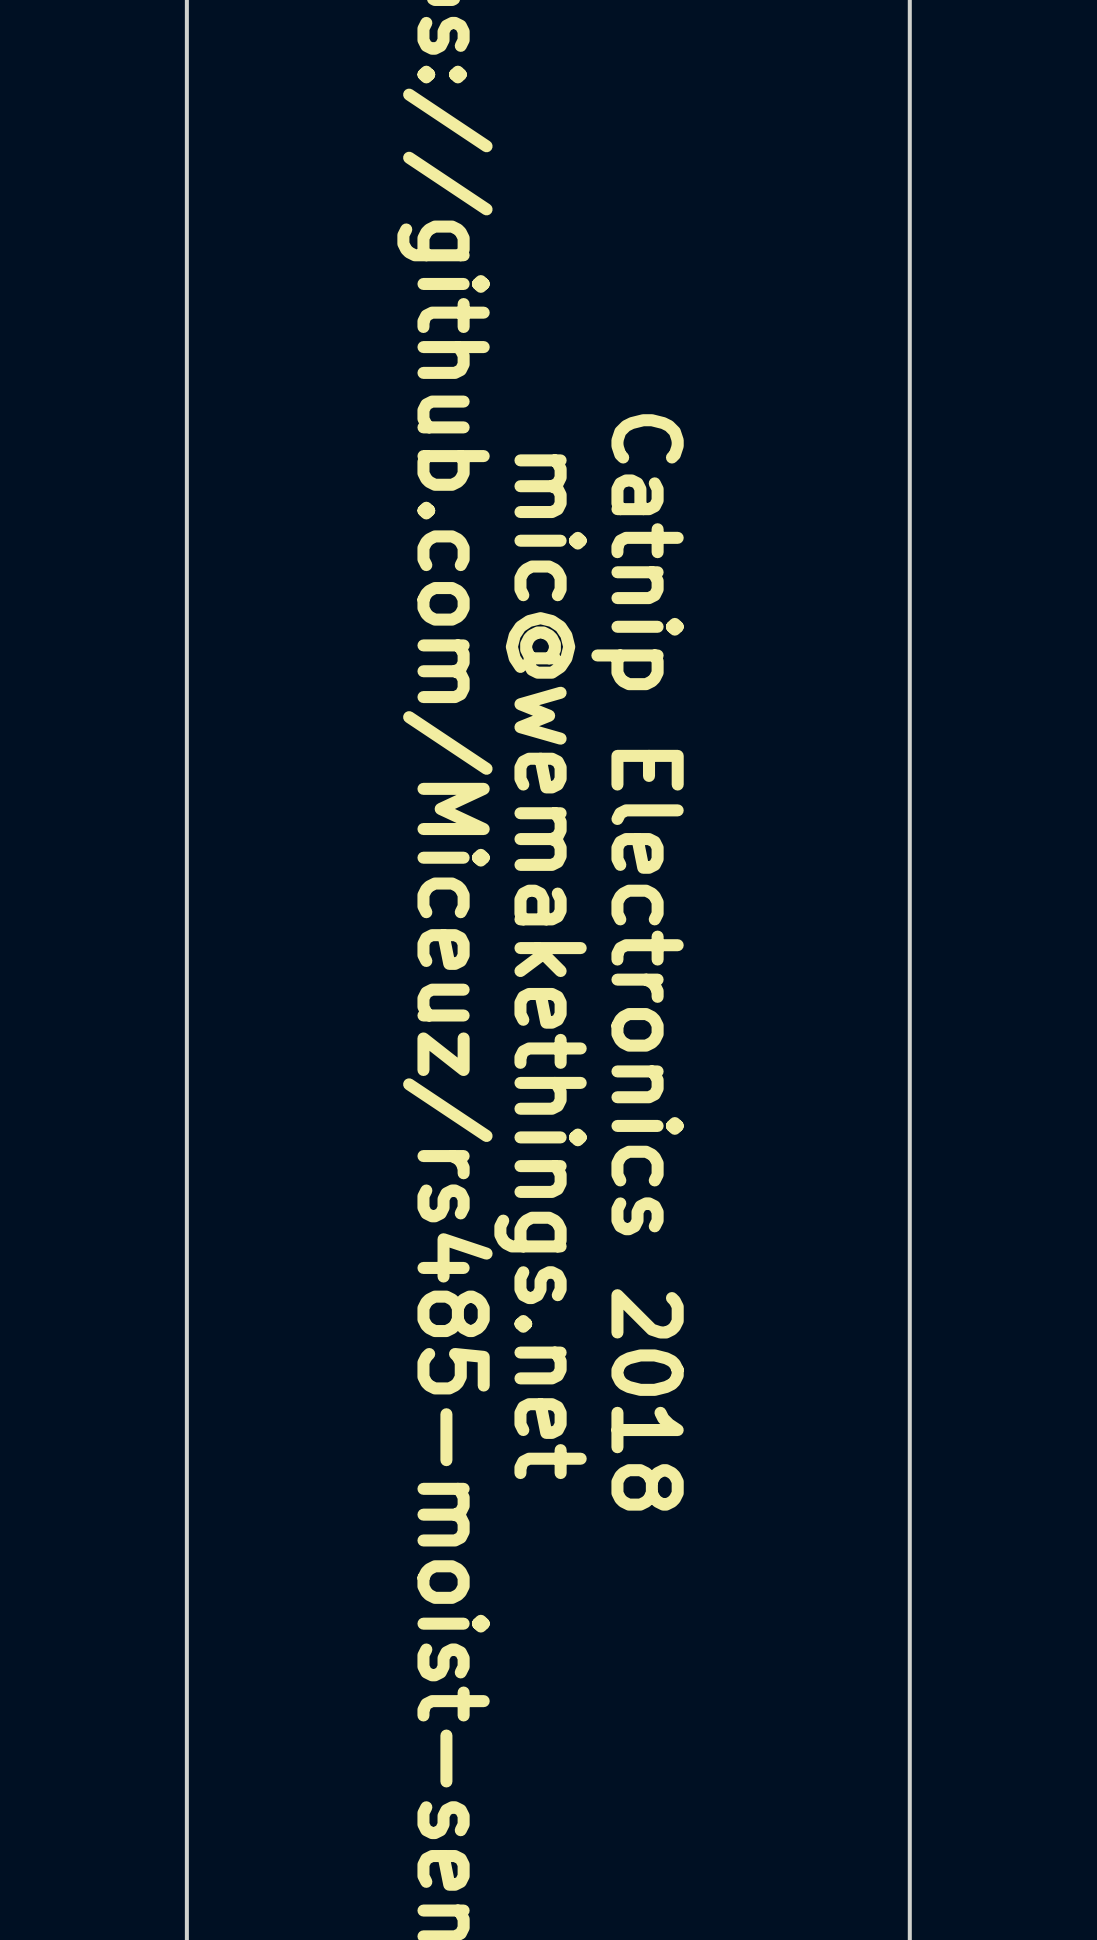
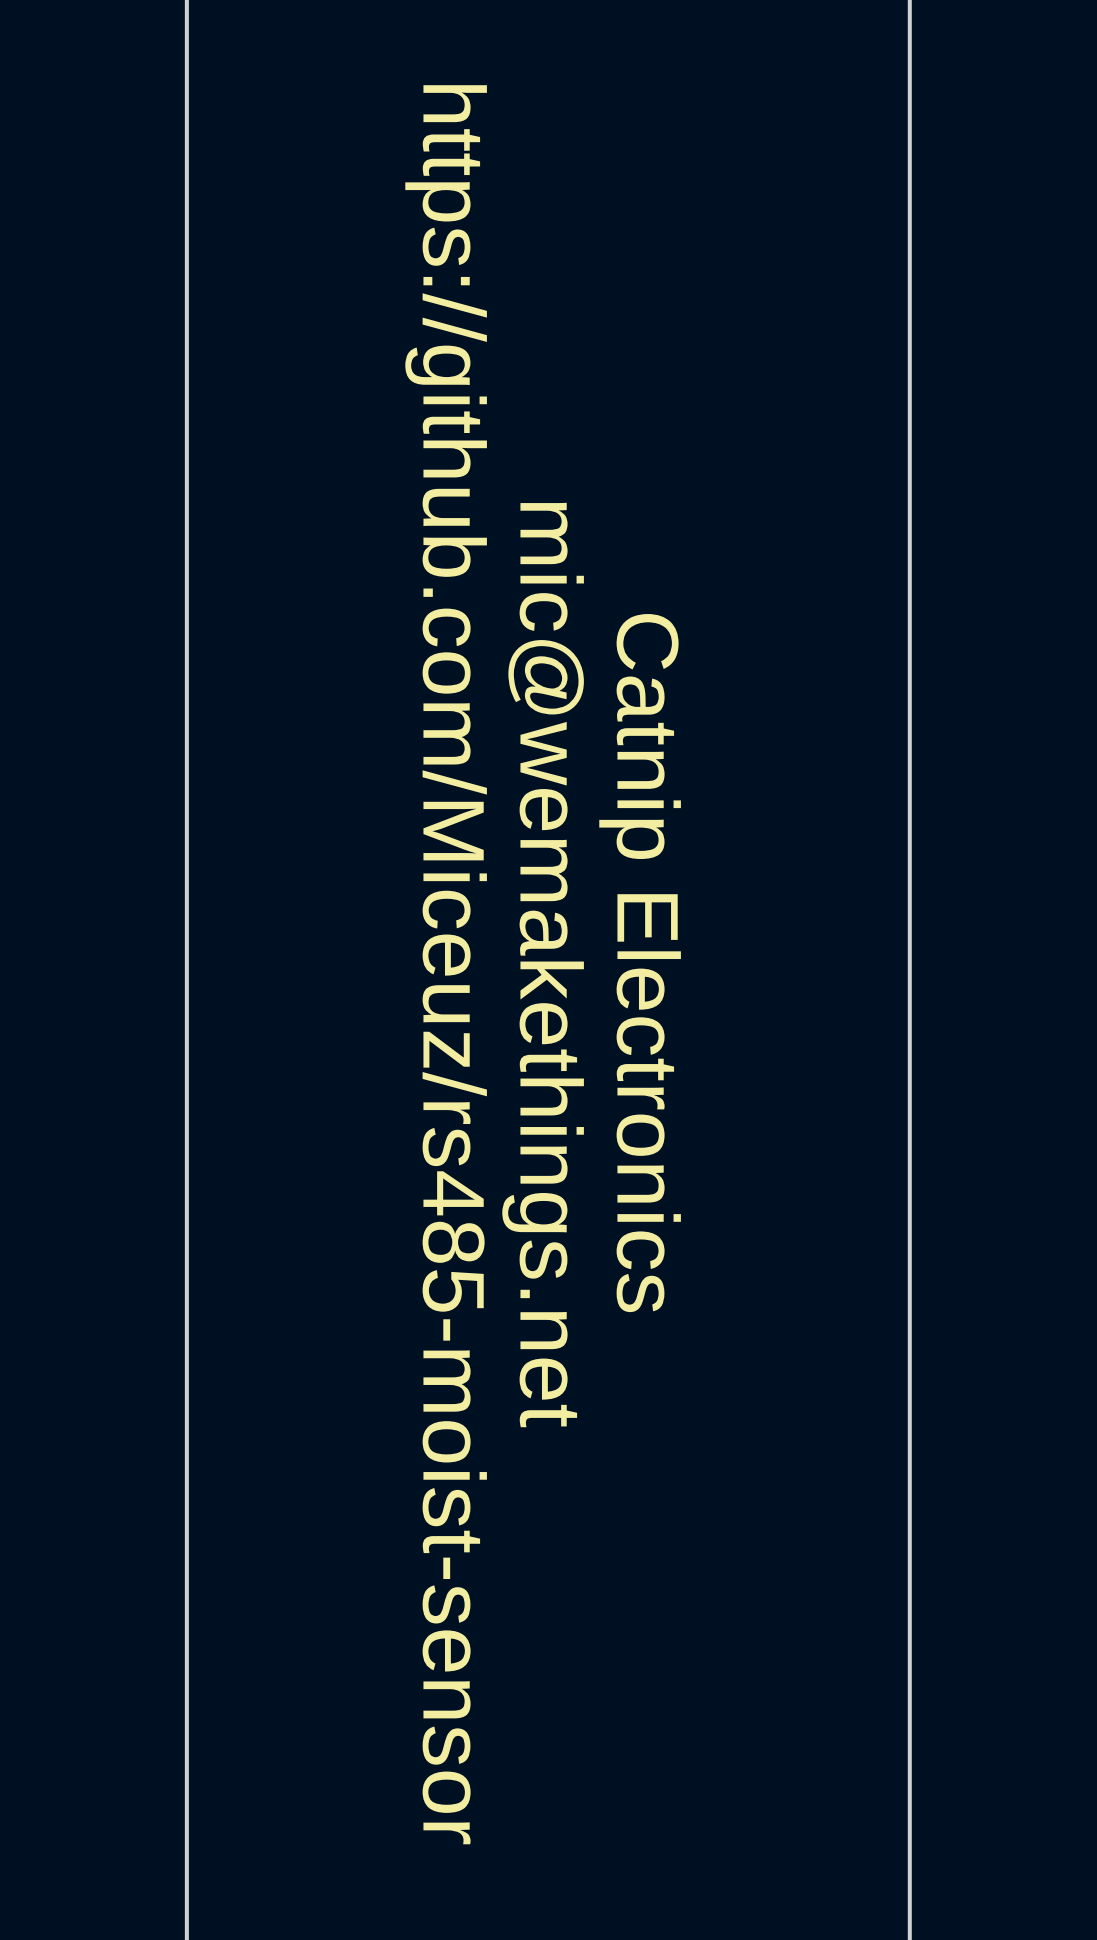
text: Catnip Electronics 2018 (637, 962) -> Catnip Electronics (640, 963)

